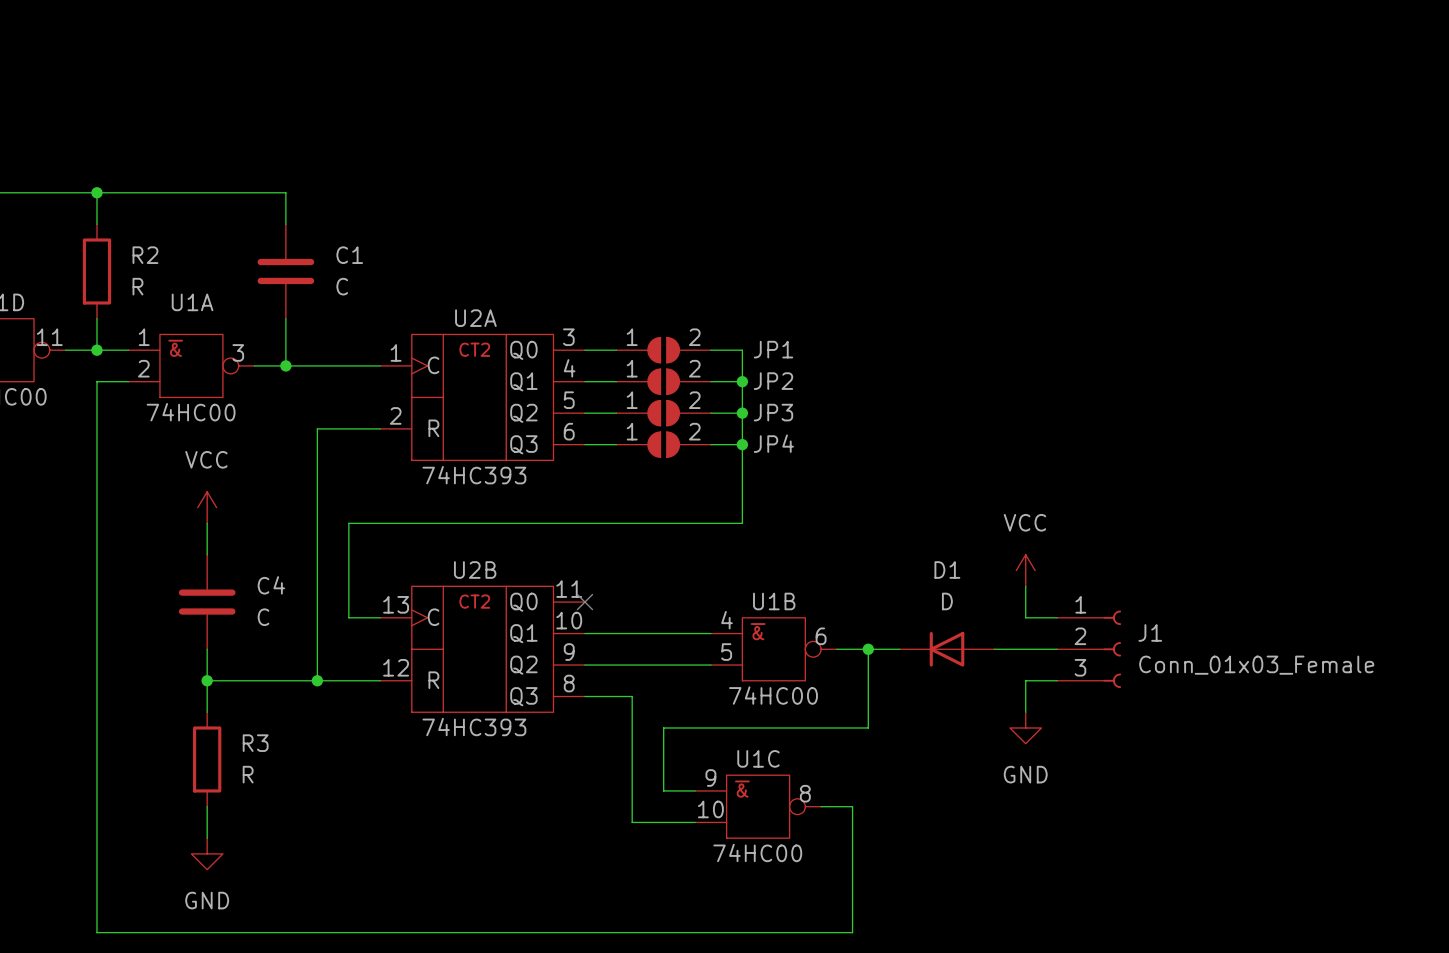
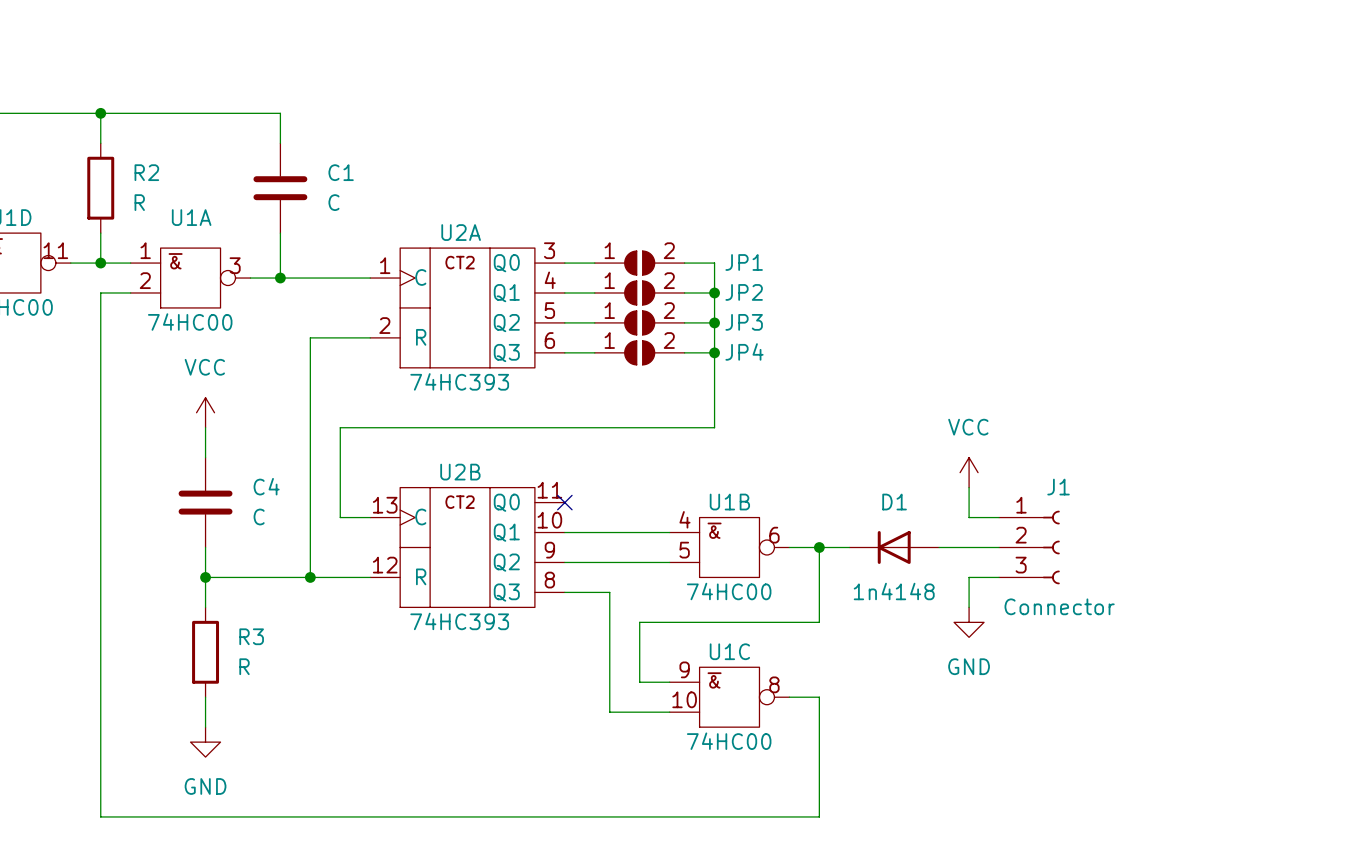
D1 name position: D1 (947, 569) -> D1 (894, 502)
power symbol position: VCC (1025, 570) -> VCC (969, 472)
wire: (1025, 586) (1025, 617) -> (969, 487) (969, 517) (984, 517)
D1 value: D (947, 601) -> 1n4148 (894, 591)
J1 name position: J1 (1150, 632) -> J1 (1058, 487)
U1B position: (773, 649) -> (729, 547)
wire: (868, 649) (868, 727) (852, 727) -> (819, 547) (819, 622)
junction position: (868, 649) -> (819, 547)
D1 position: (947, 649) -> (894, 547)
J1 position: (1089, 649) -> (1029, 547)
J1 value: Conn_01x03_Female (1256, 665) -> Connector (1059, 606)
wire: (1025, 680) (1025, 712) -> (984, 577) (969, 577) (969, 607)
power symbol position: GND (1025, 727) -> GND (969, 622)

